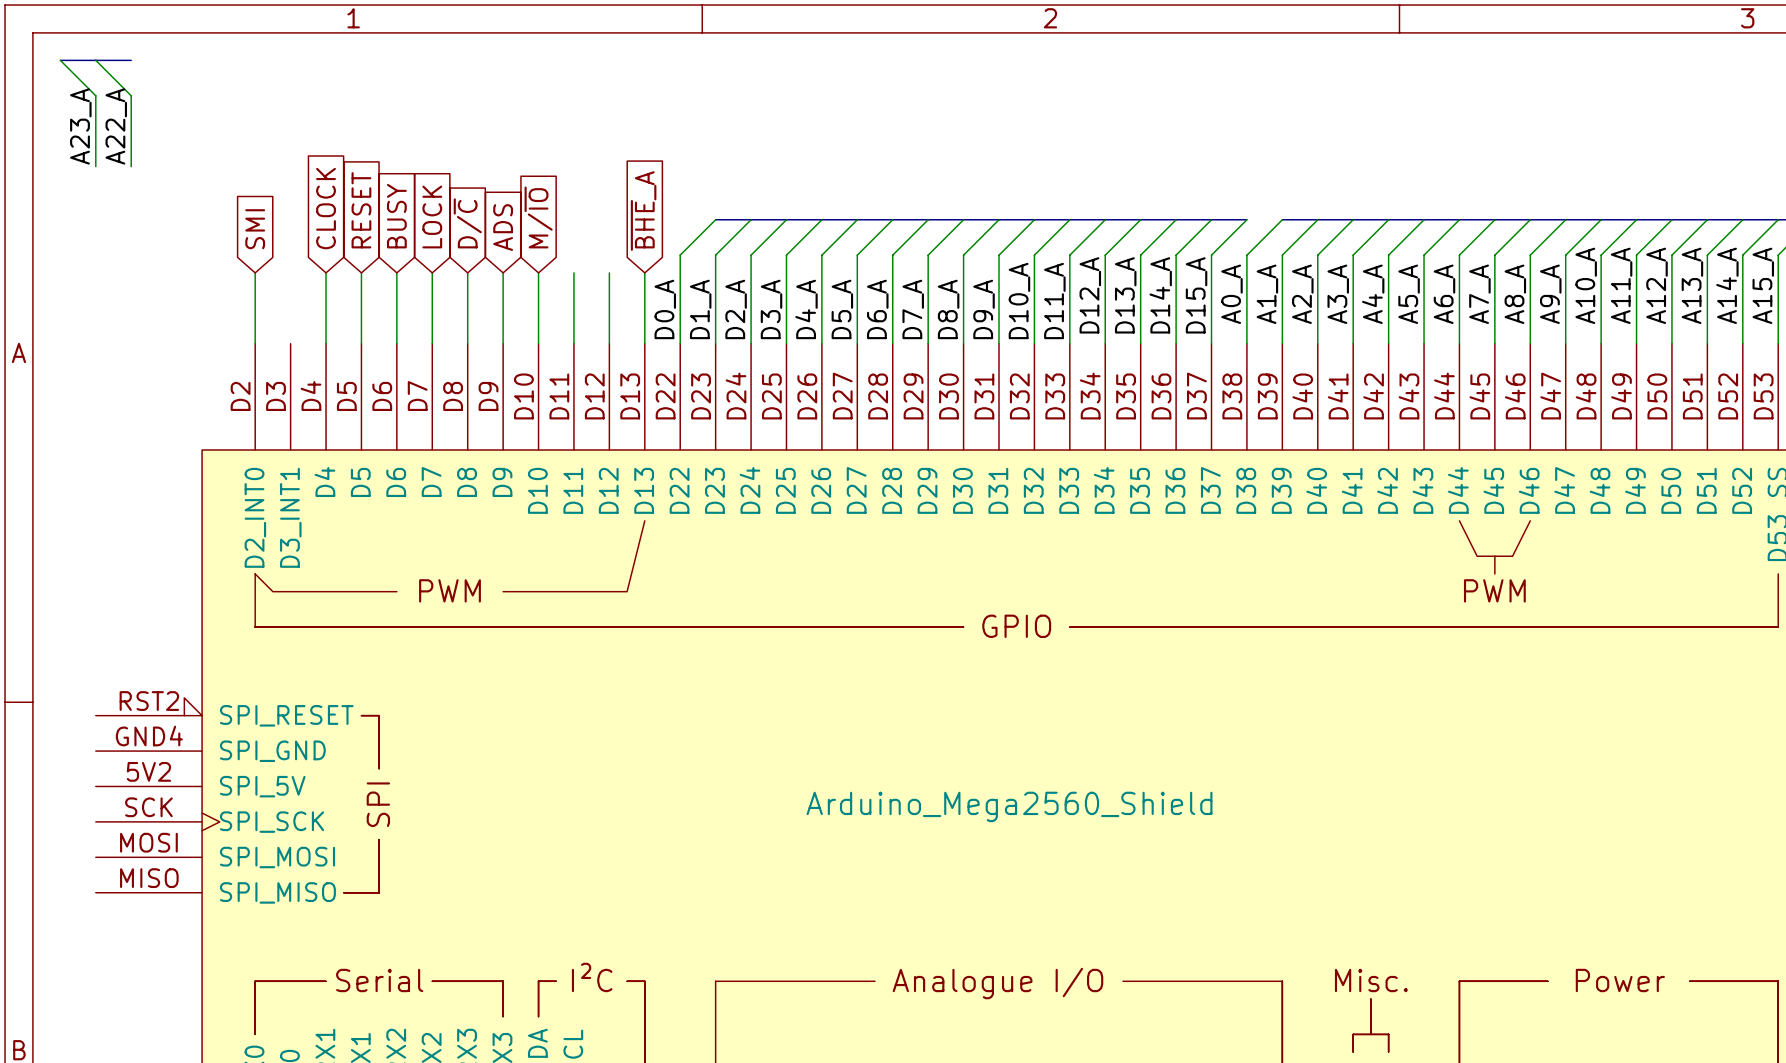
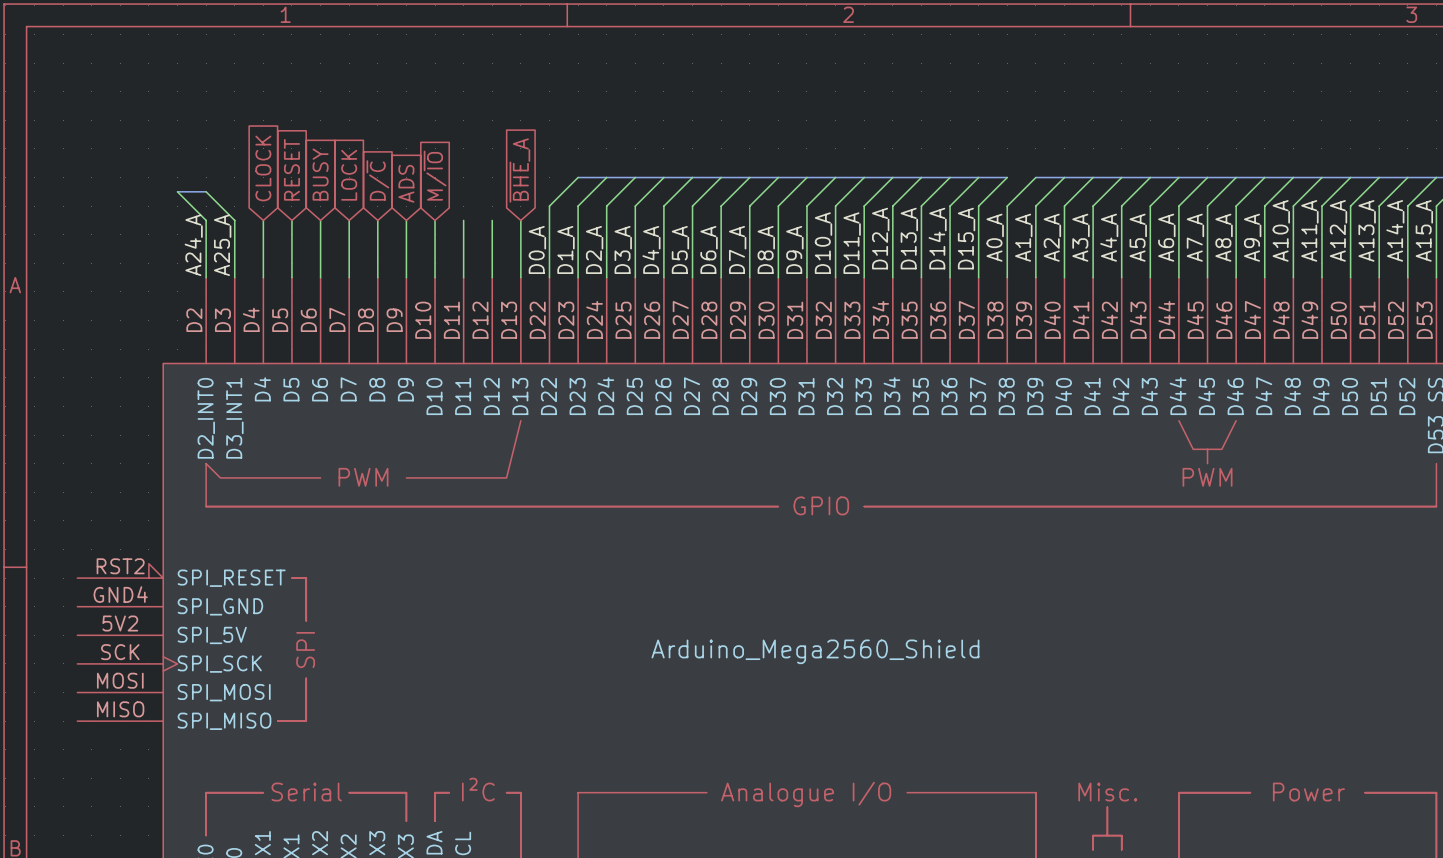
wire: (60, 60) (95, 95) (95, 166) -> none
bus: (60, 60) (131, 60) -> none
wire: (95, 60) (131, 95) (131, 166) -> (206, 191) (234, 220) (234, 277)
label: A23_A (80, 126) -> none
label: A22_A (116, 126) -> none
global label: SMI (255, 229) -> none
wire: none -> (177, 191) (206, 220)
bus: none -> (177, 191) (206, 191)
label: none -> A24_A (193, 245)
label: none -> A25_A (222, 245)

